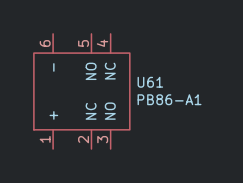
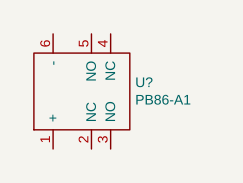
U61 name: U61 (150, 82) -> U? (144, 82)

